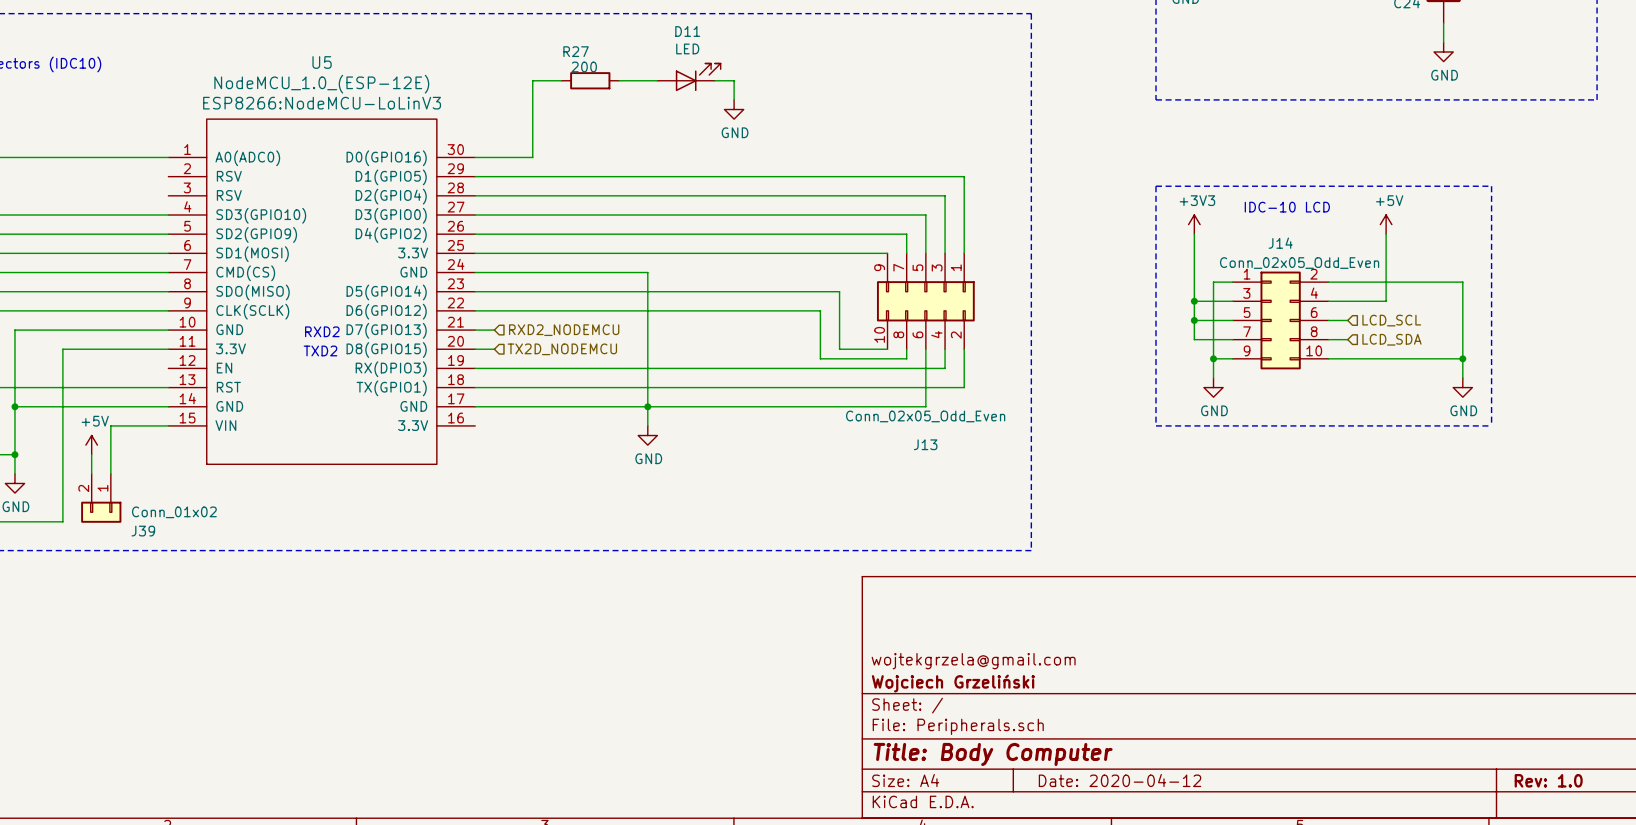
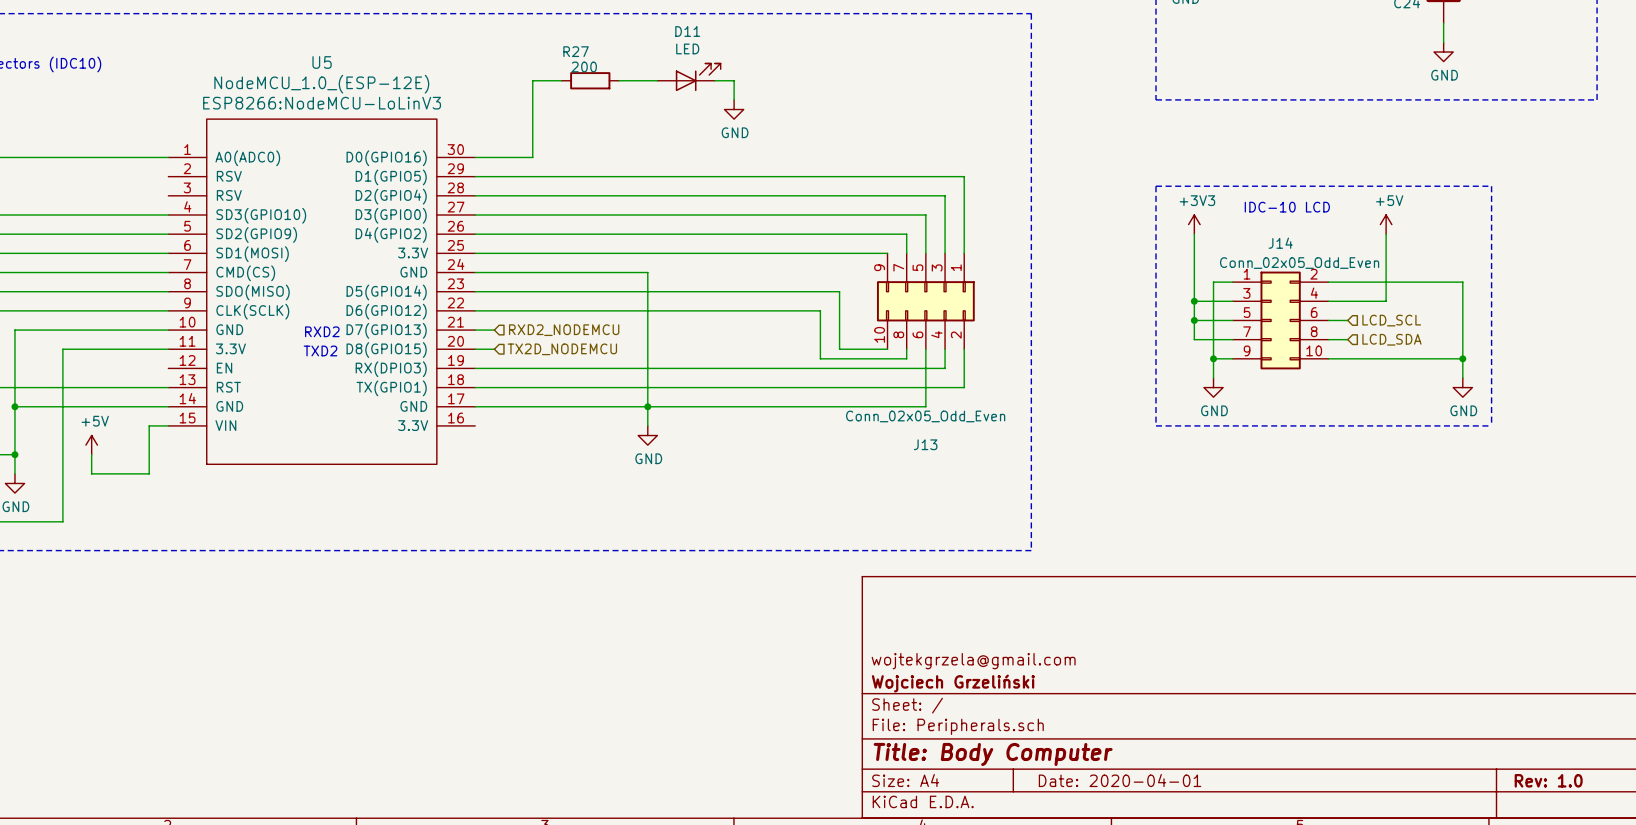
wire: (149, 425) (110, 425) (110, 473) -> (149, 425) (149, 473) (91, 473)
J39: Conn_01x02 (101, 498) -> none
title block: Date: 2020-04-12 (1120, 780) -> Date: 2020-04-01 (1120, 780)

